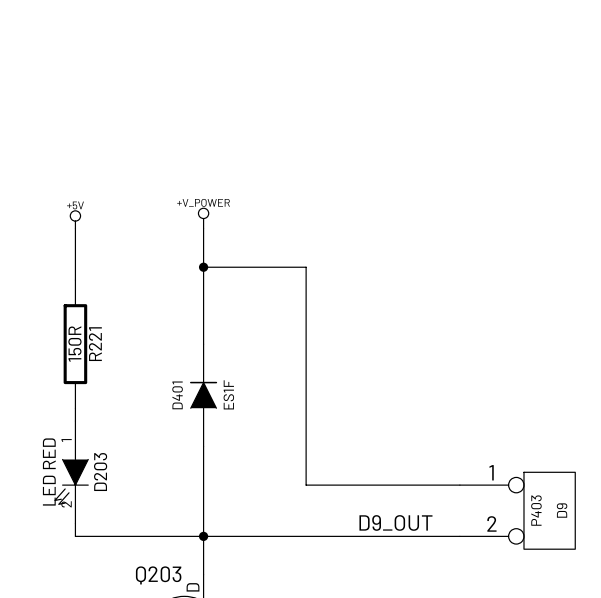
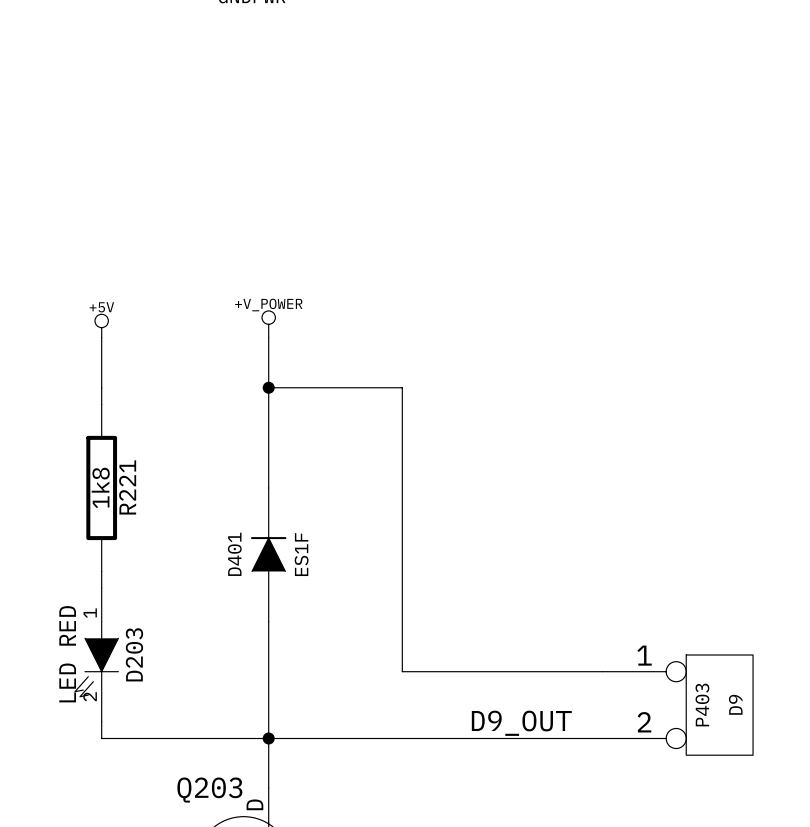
R221 value: 150R (74, 344) -> 1k8 (100, 488)

